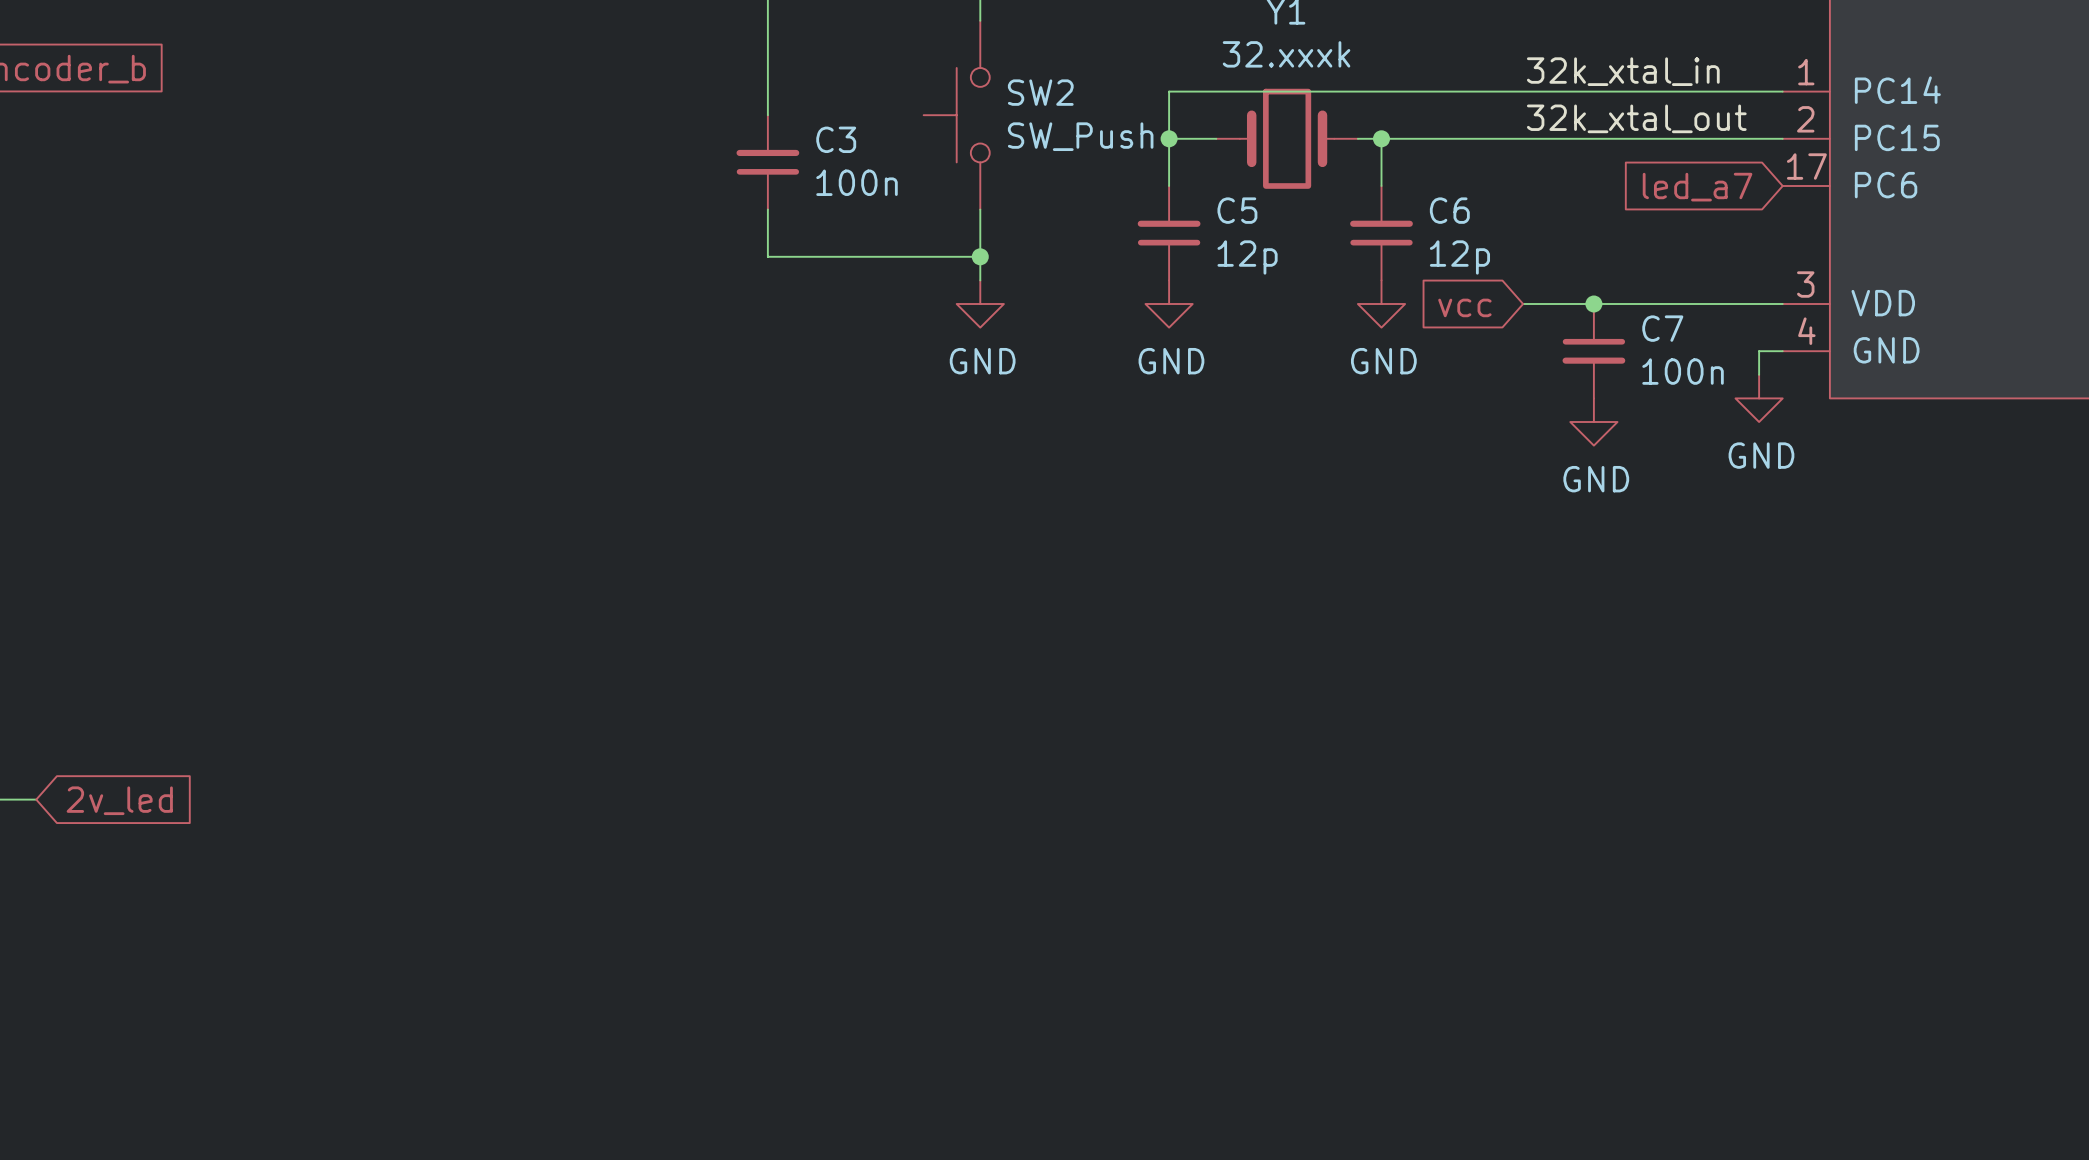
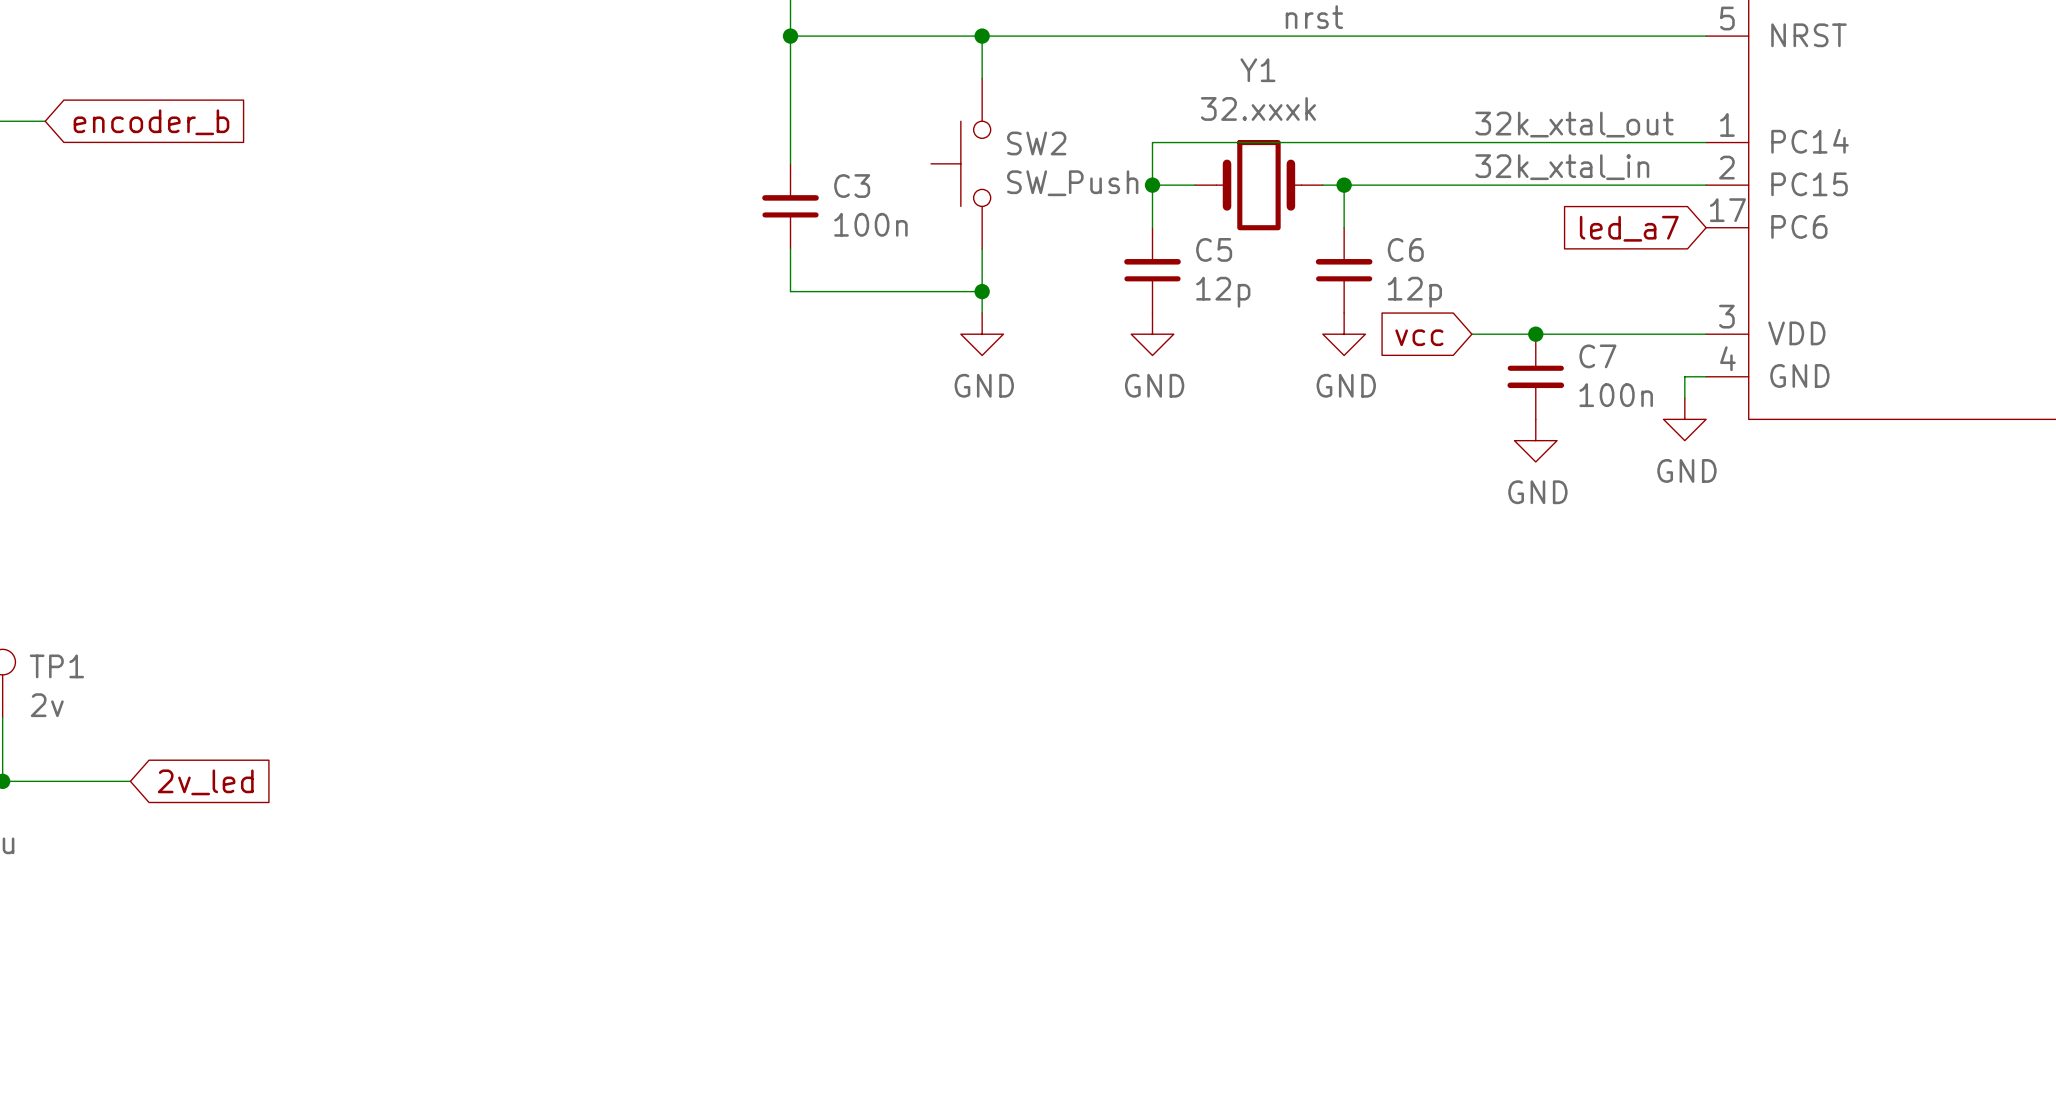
label: 32k_xtal_in (1623, 71) -> 32k_xtal_out (1574, 124)
label: 32k_xtal_out (1636, 118) -> 32k_xtal_in (1562, 167)

